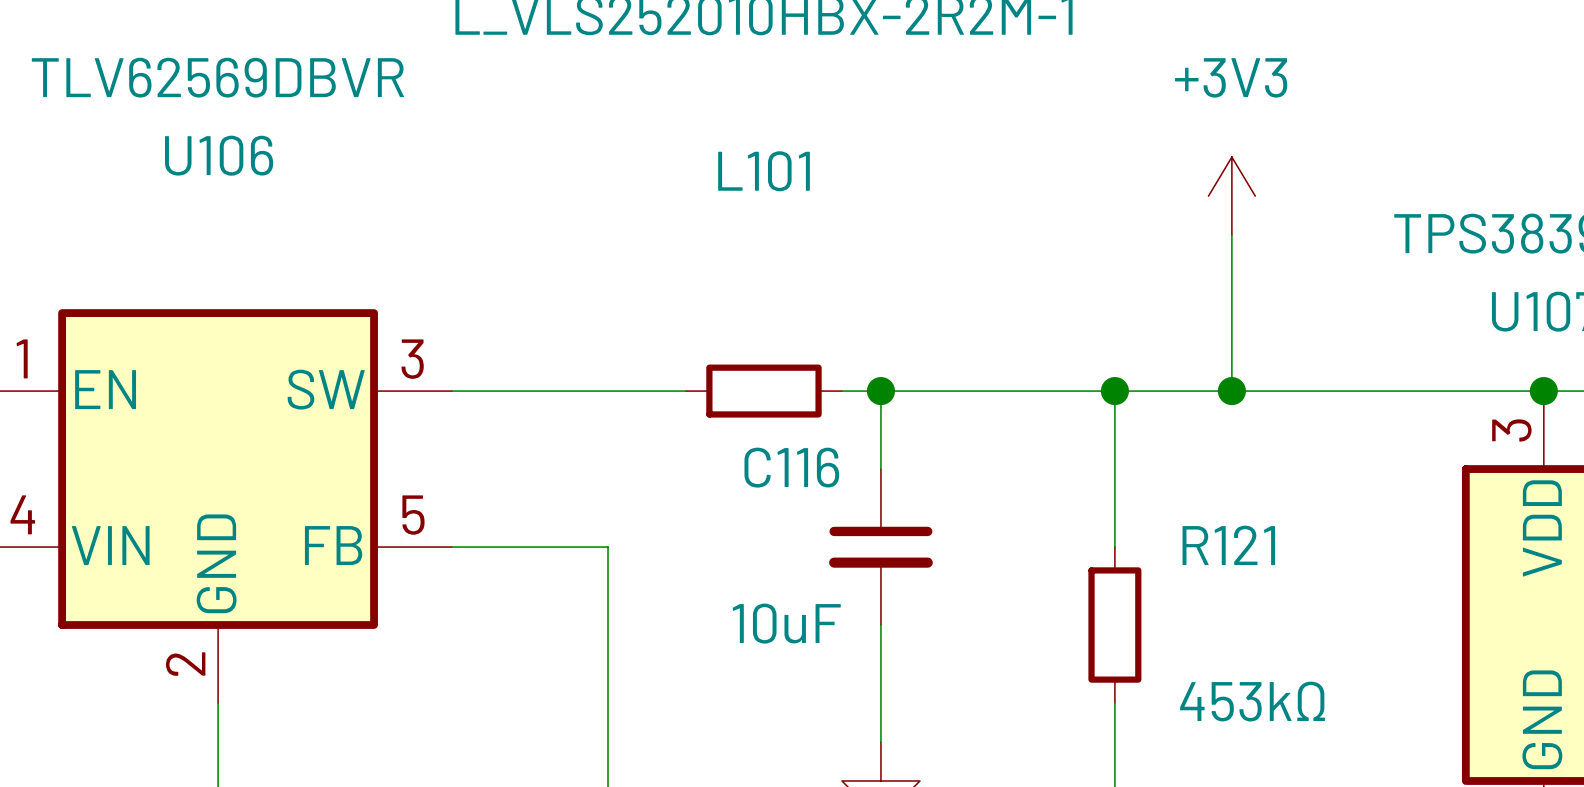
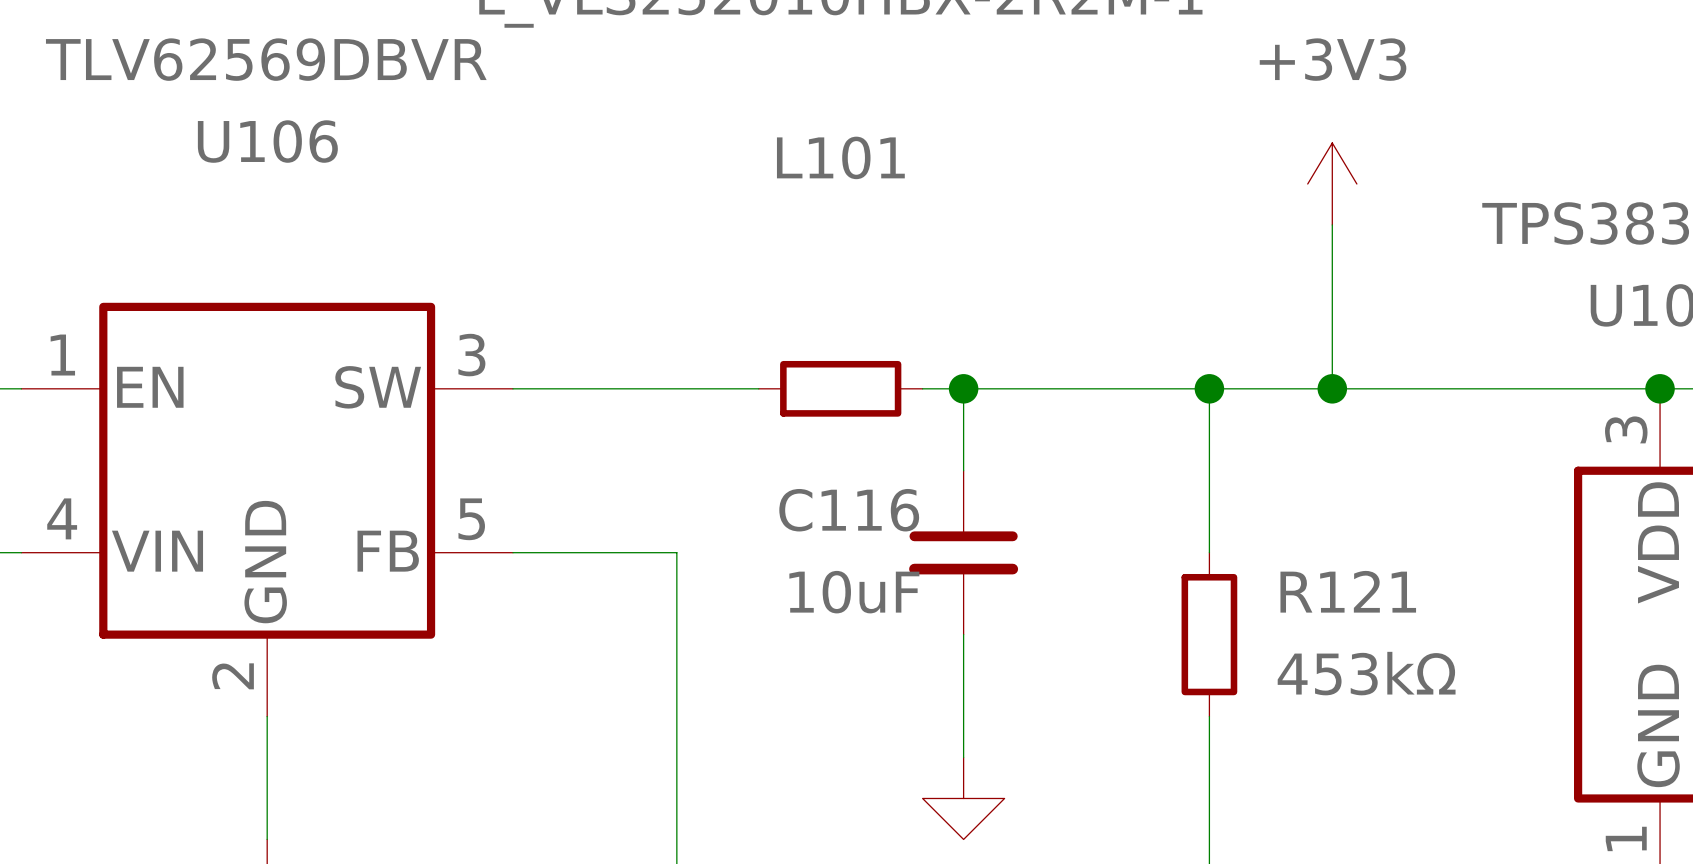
C116 name position: C116 (791, 467) -> C116 (849, 510)
R121 name position: R121 (1228, 545) -> R121 (1348, 591)
C116 value position: 10uF (786, 623) -> 10uF (854, 592)
R121 value position: 453kΩ (1252, 701) -> 453kΩ (1366, 673)

